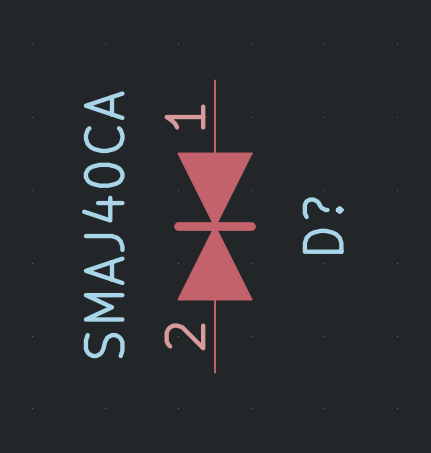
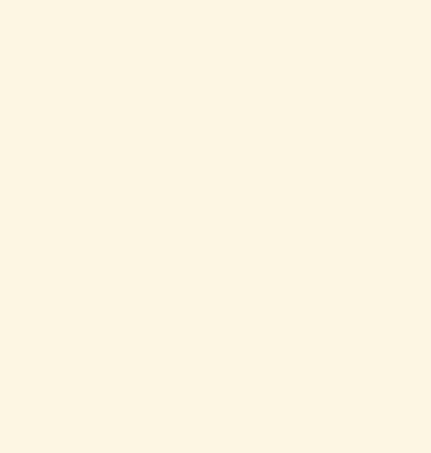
D?: SMAJ40CA (215, 226) -> none

